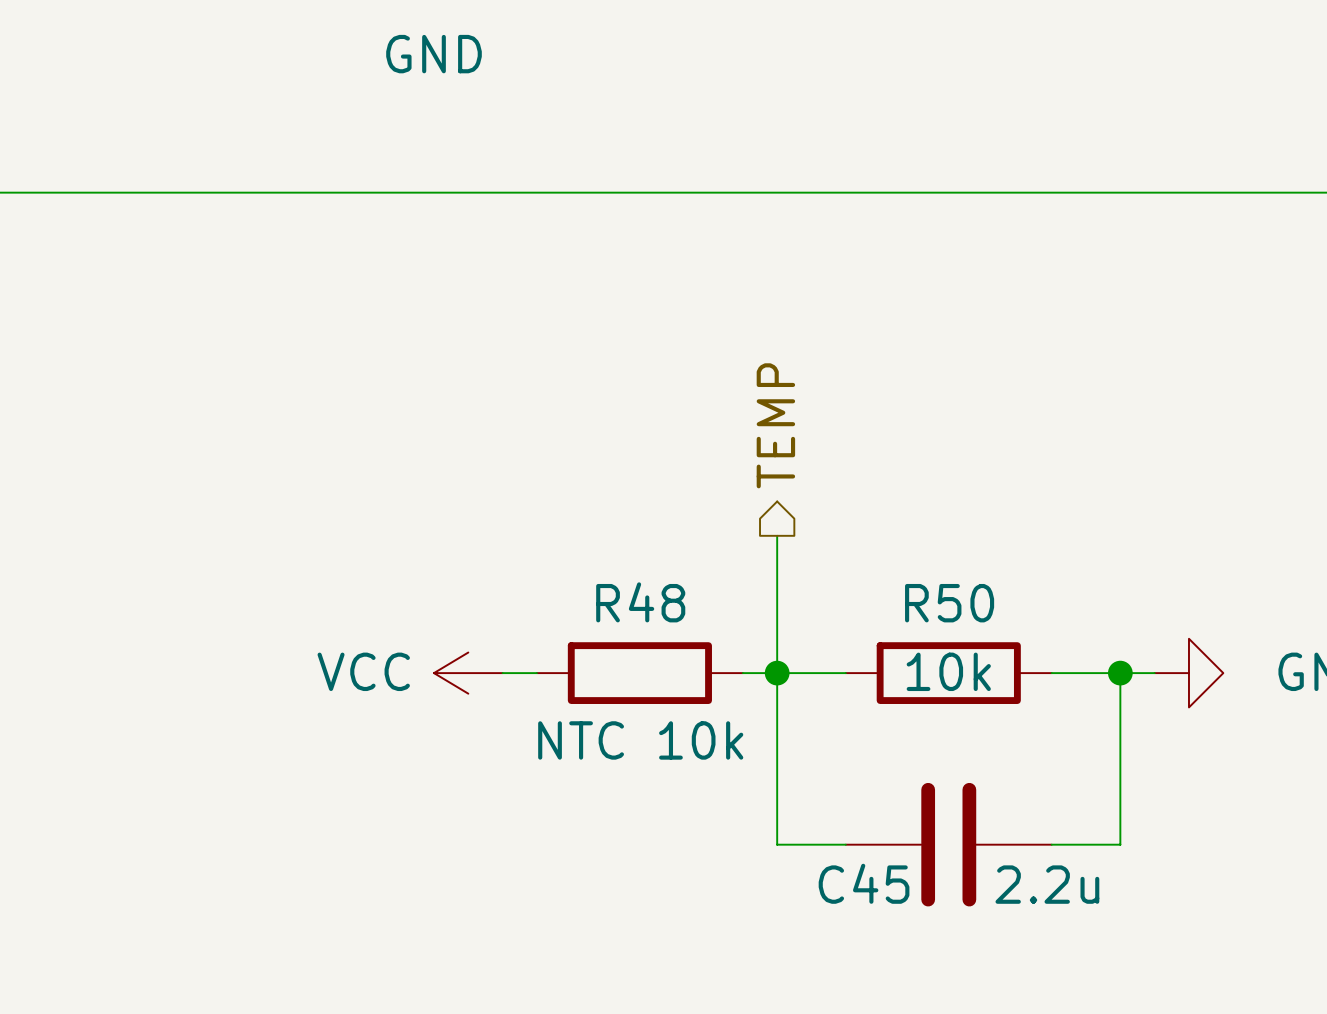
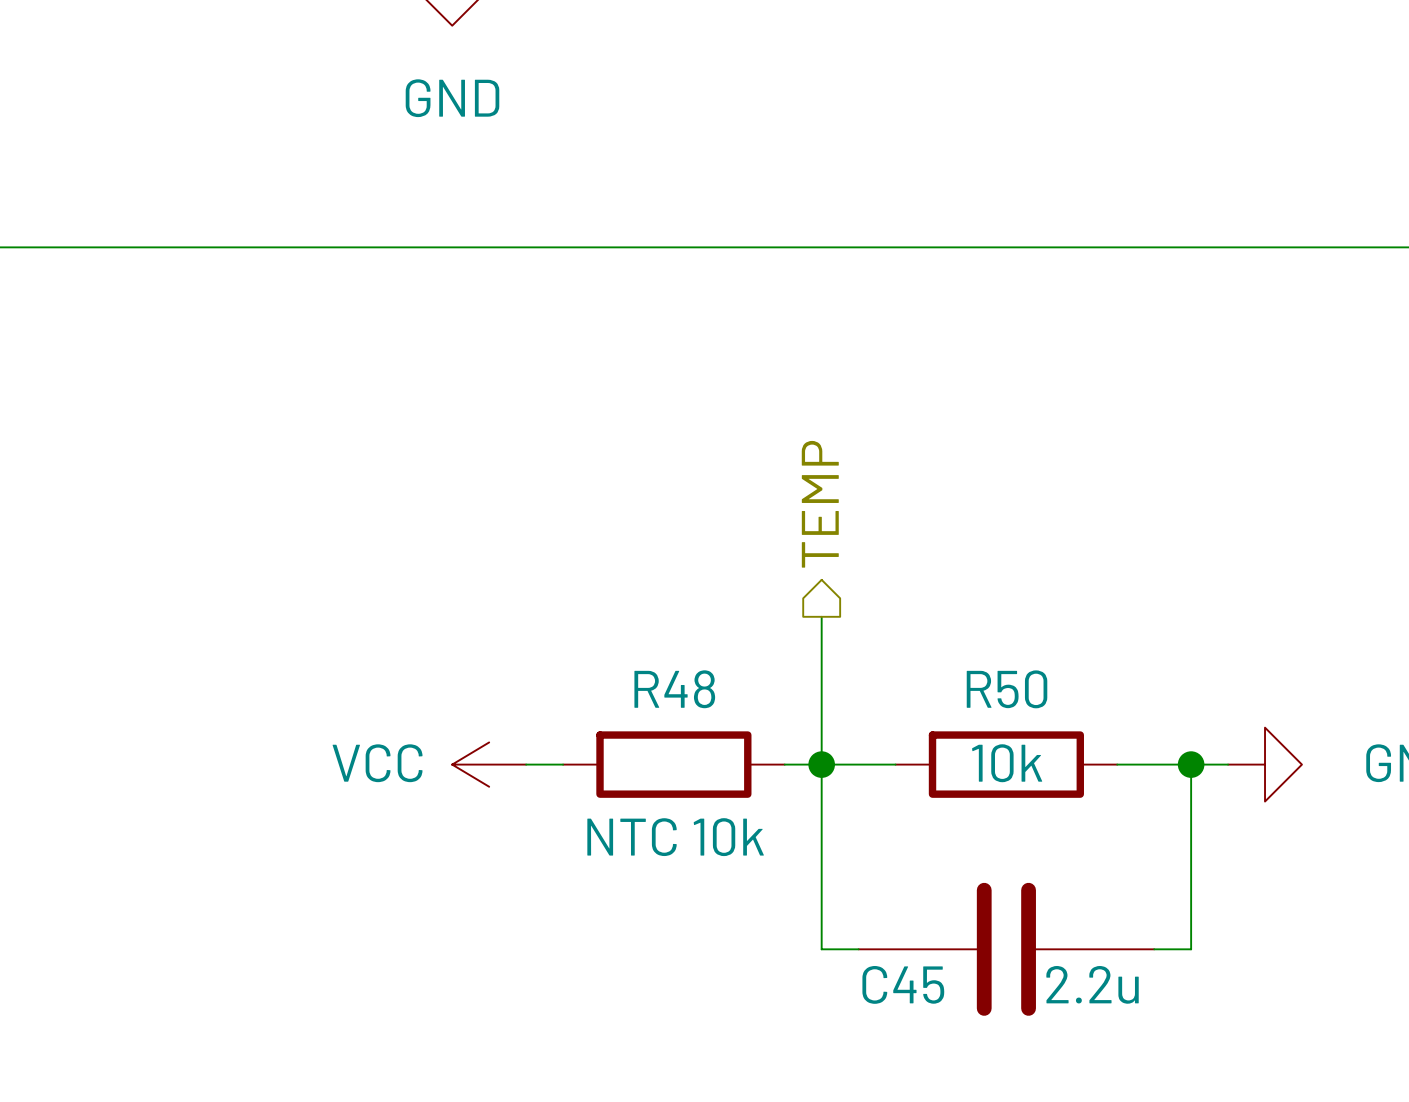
C45 symbol: [845, 782, 1052, 907] -> [858, 882, 1155, 1016]

